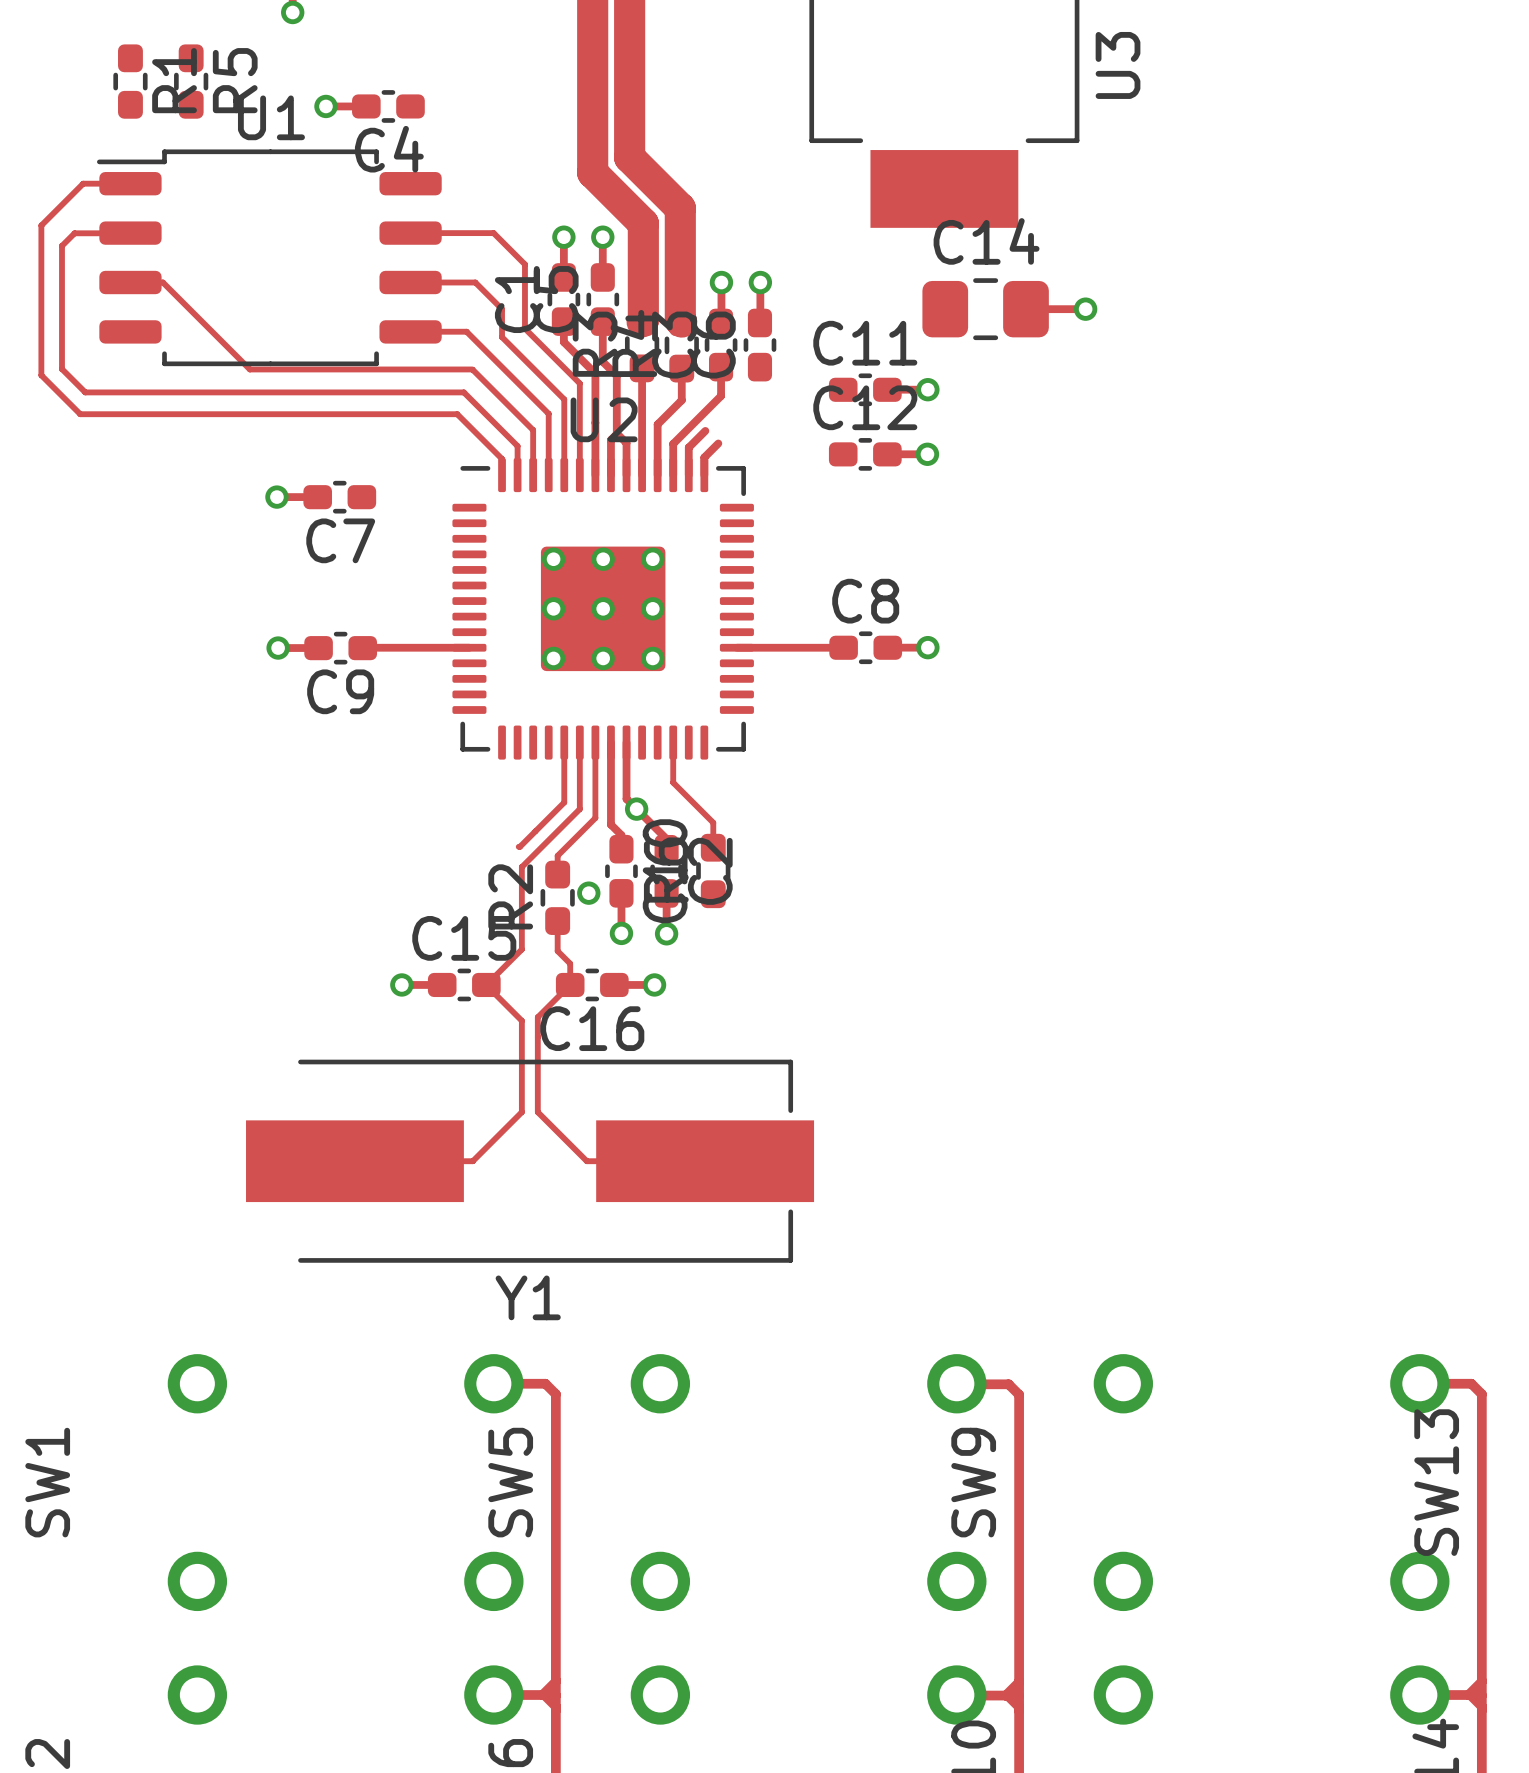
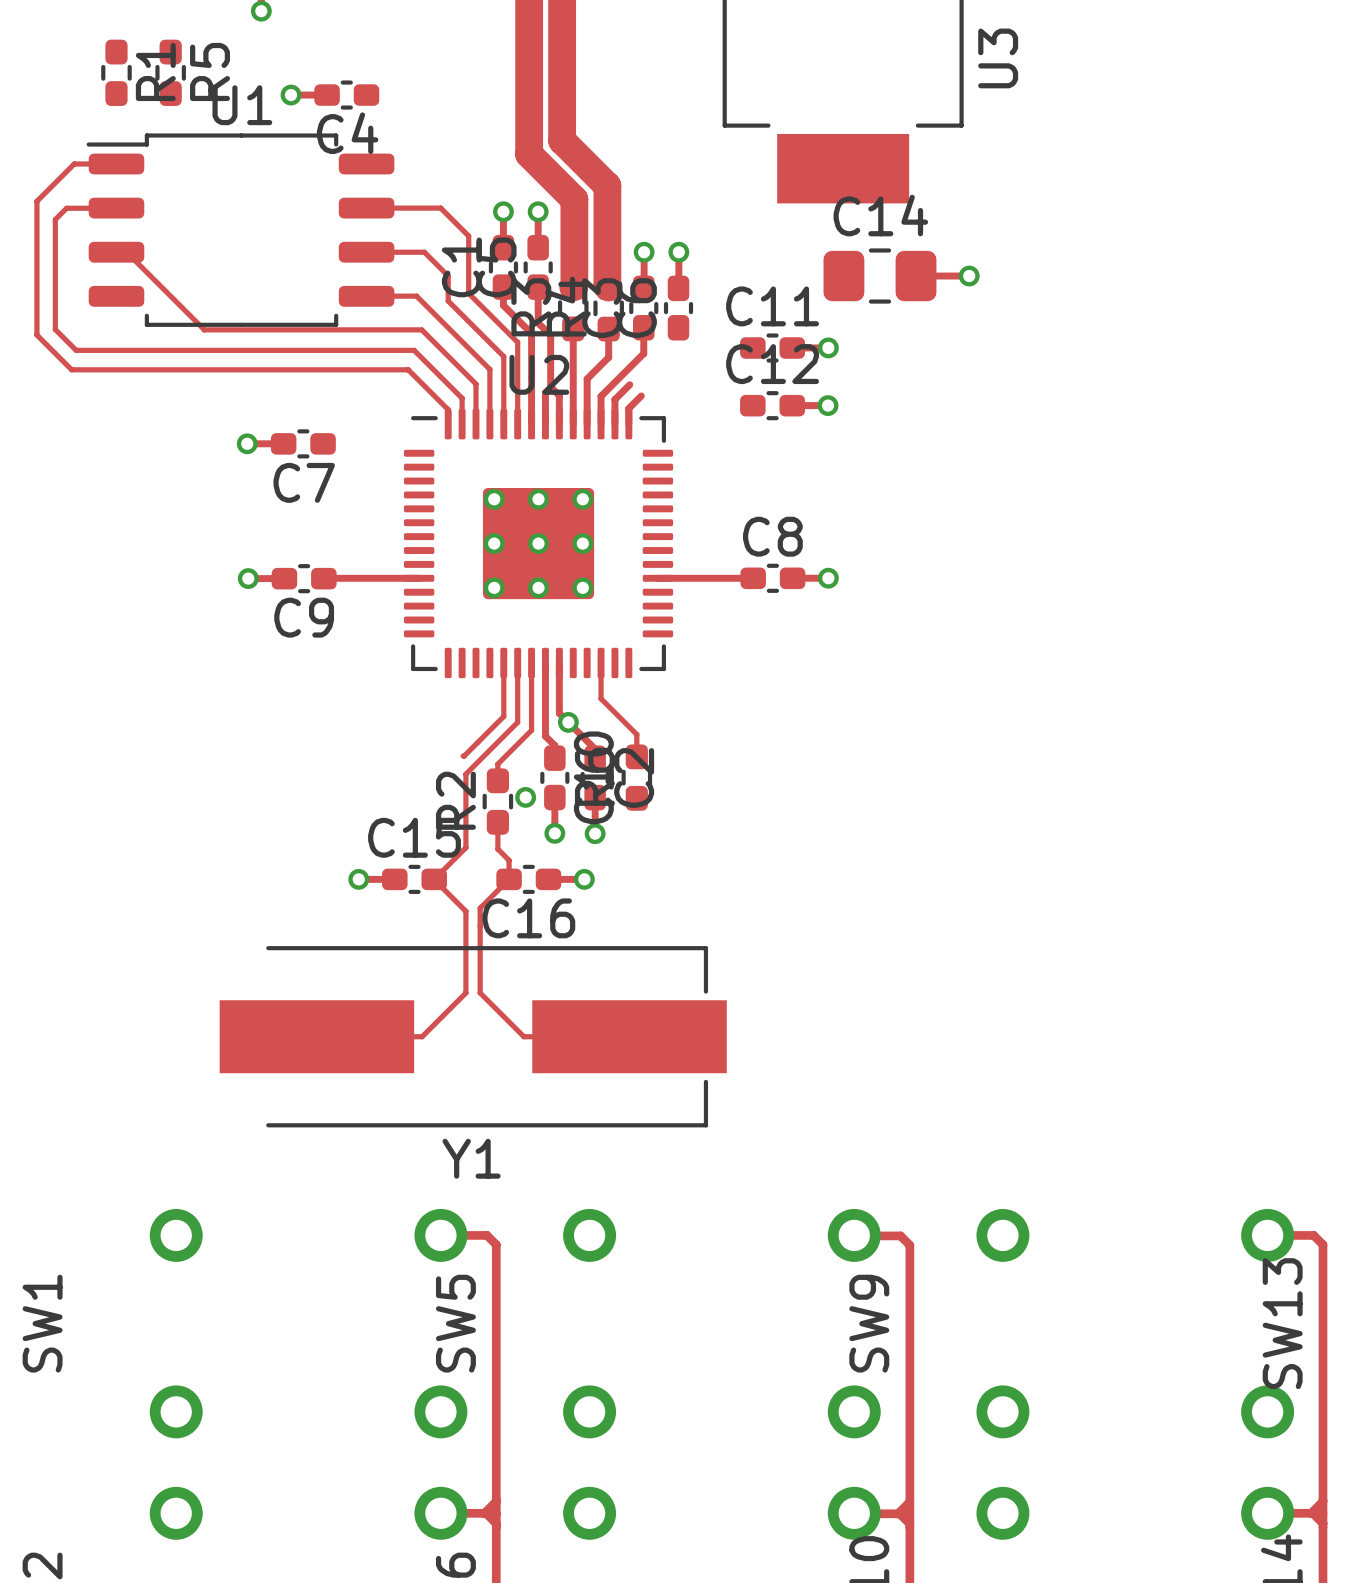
track: (141, 282) (162, 282) (249, 369) -> (126, 252) (204, 329) (223, 329)

